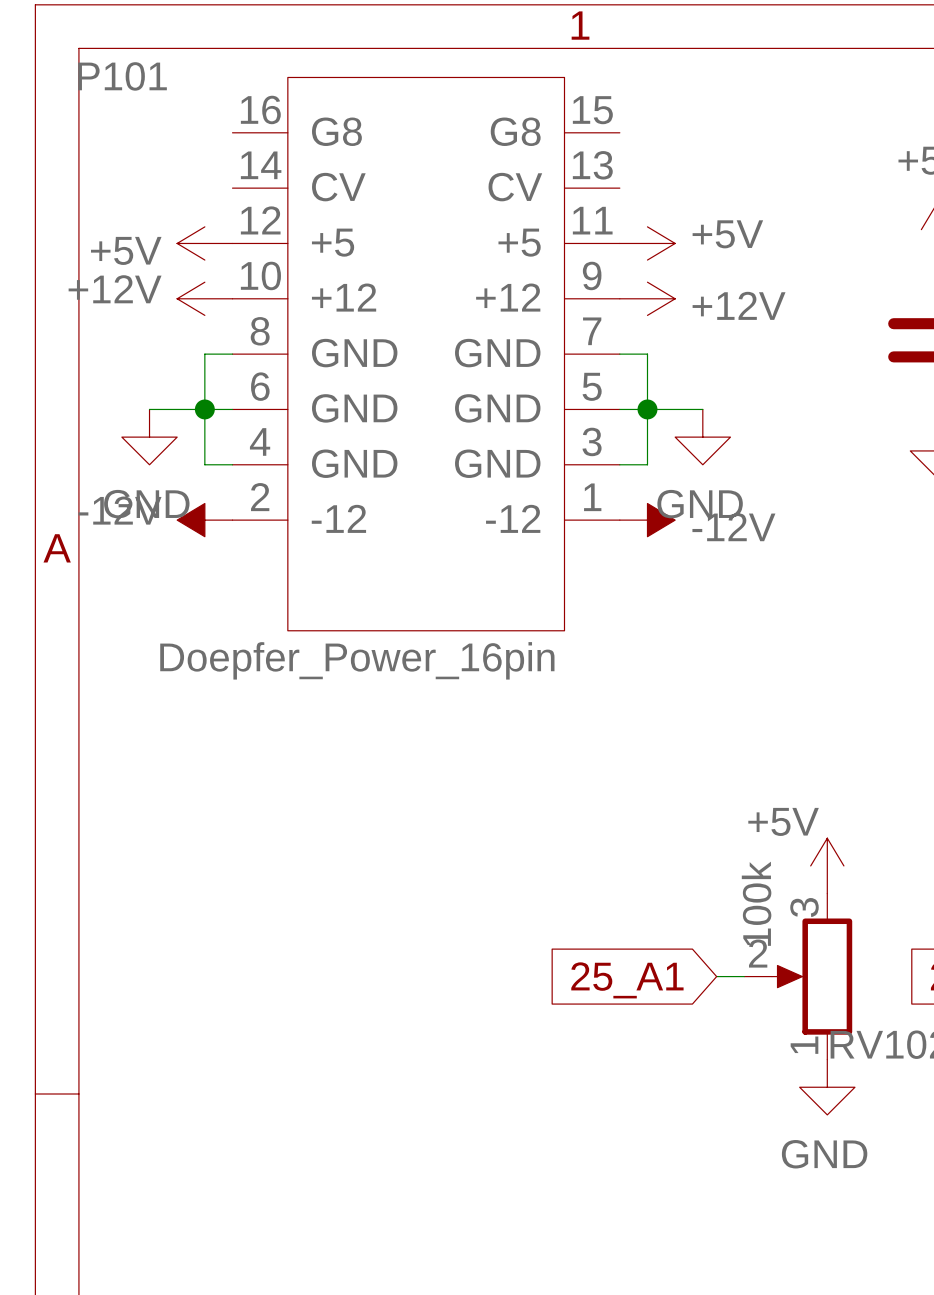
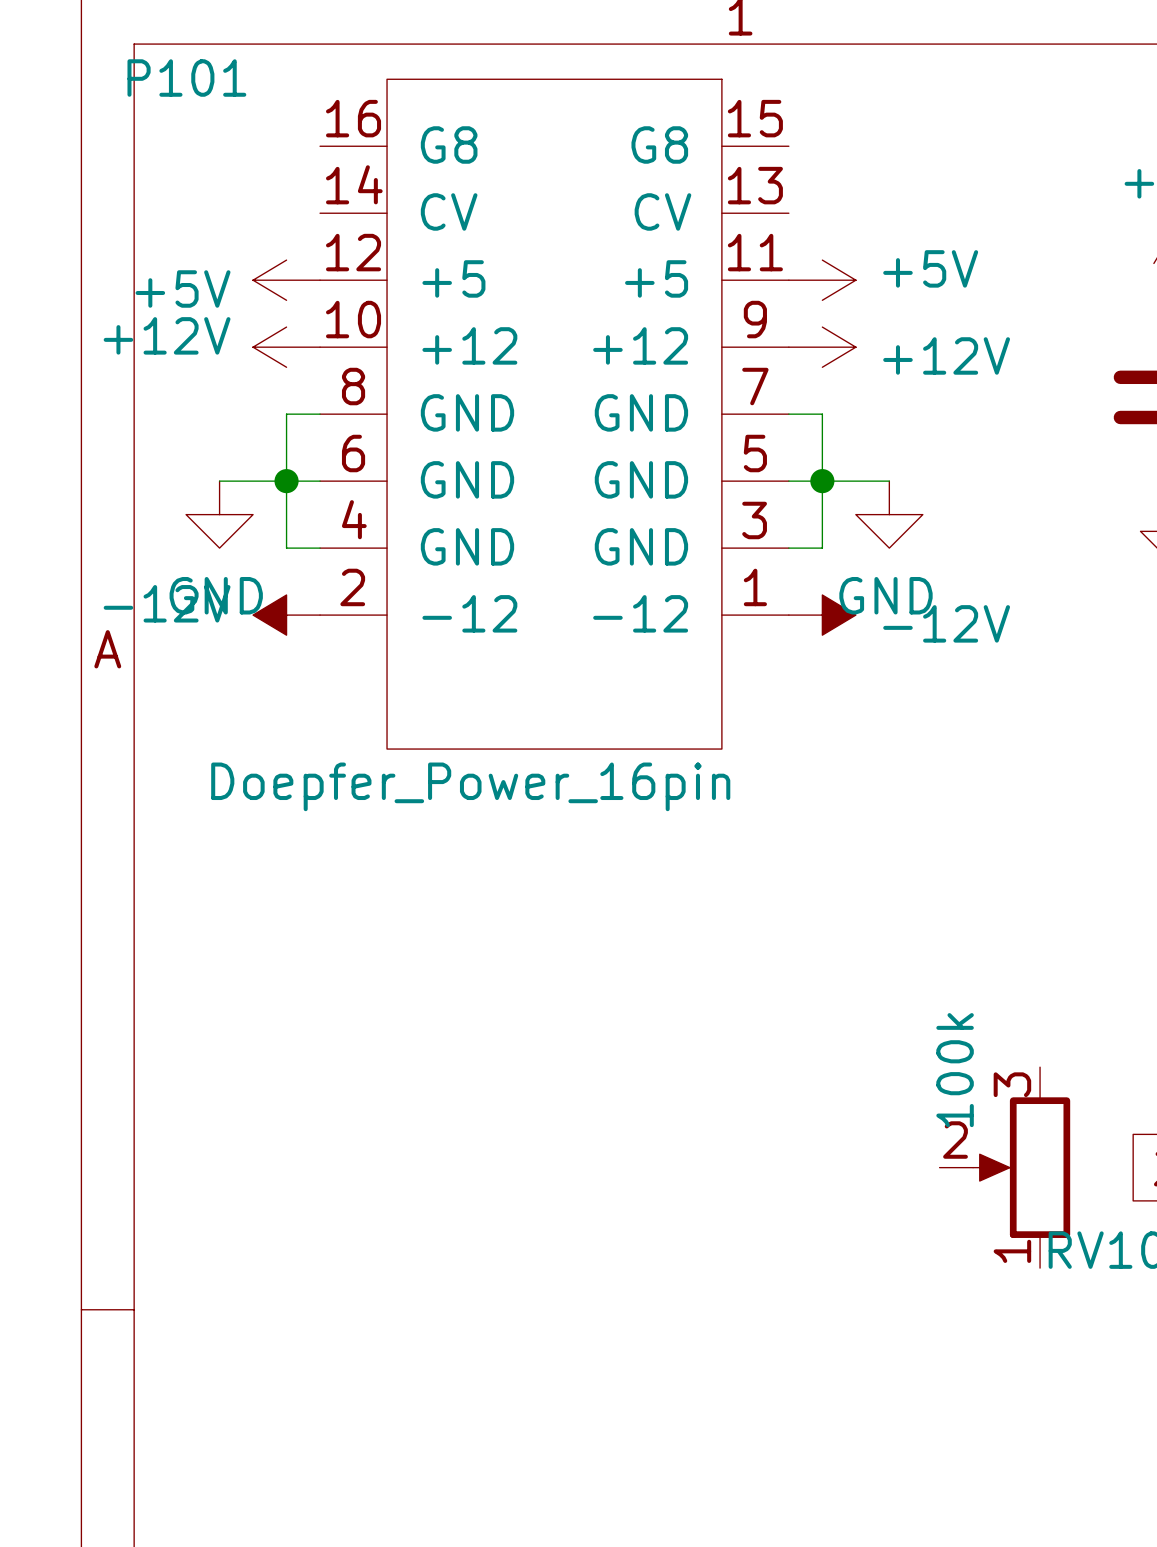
power symbol: +5V (827, 865) -> none
wire: (716, 976) (744, 976) -> none
global label: 25_A1 (627, 980) -> none
power symbol: GND (827, 1087) -> none

